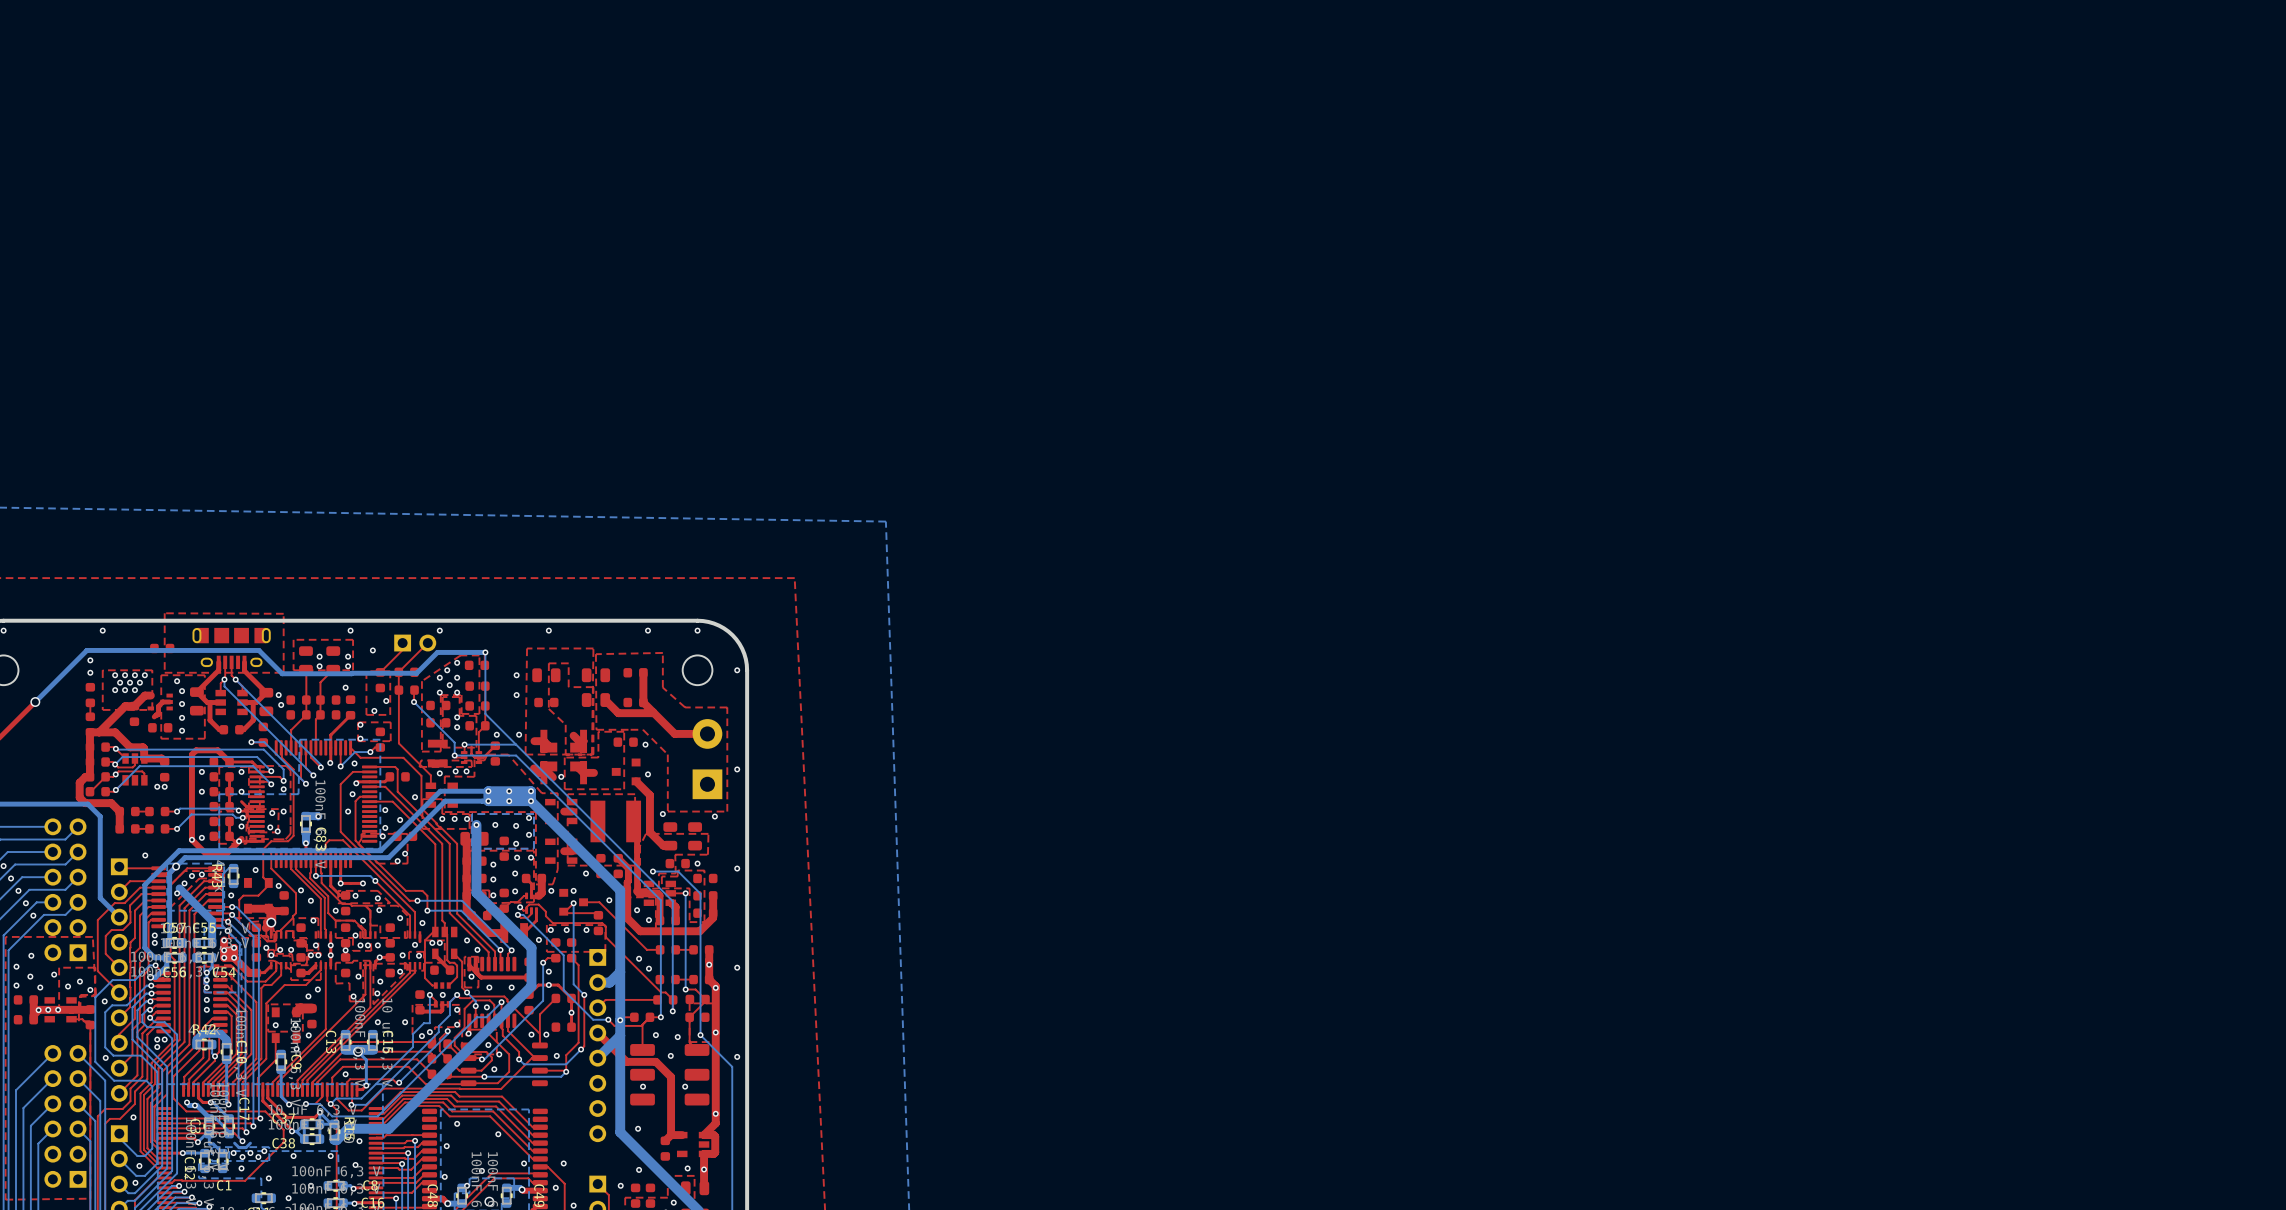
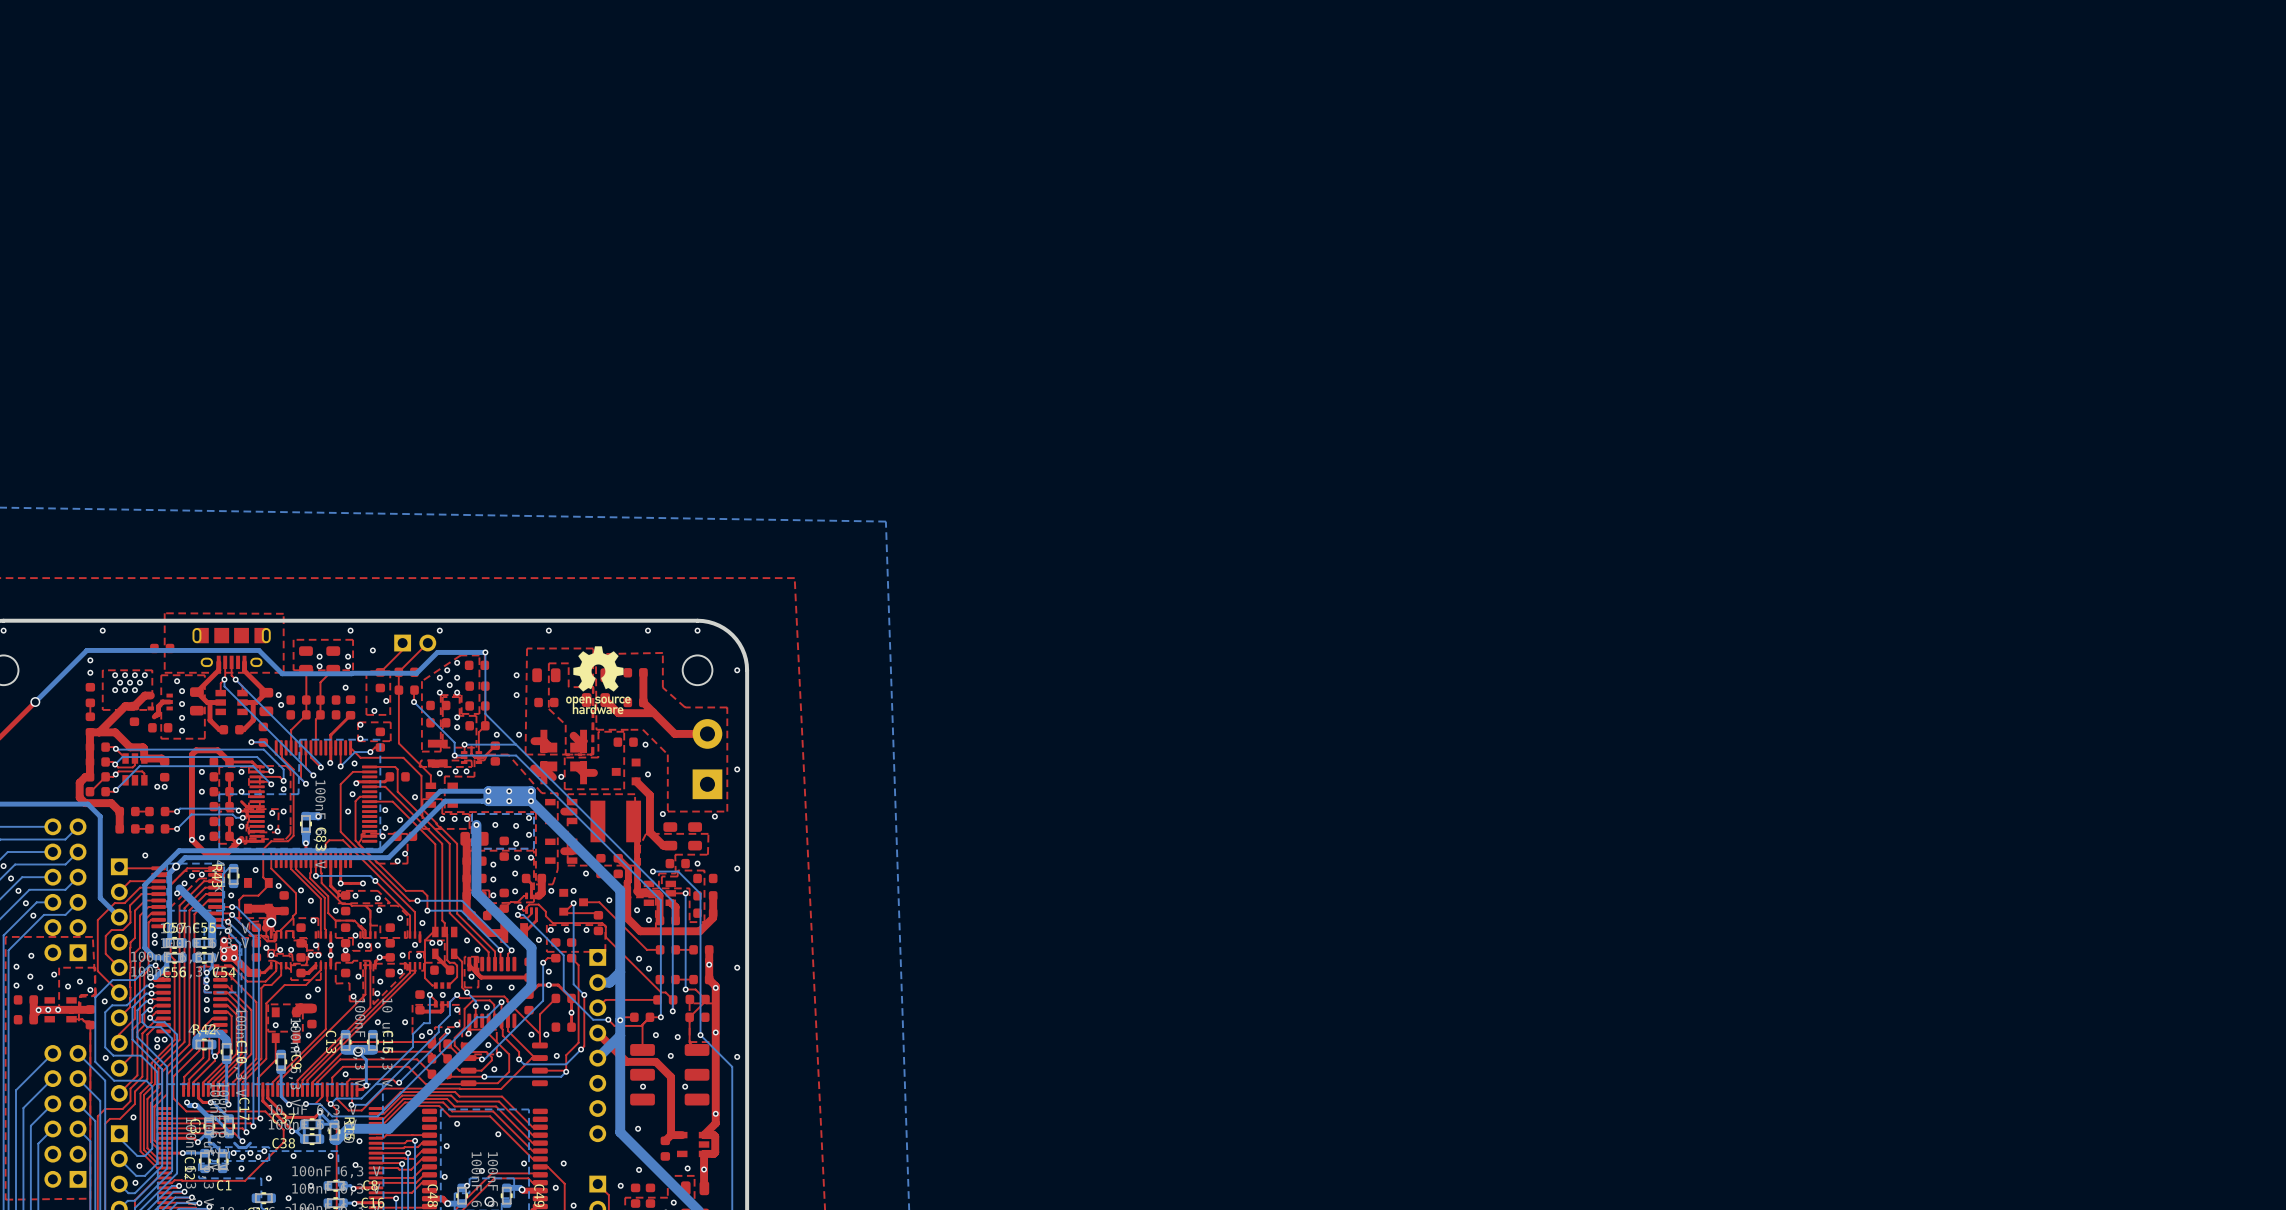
drawing: none -> [566, 646, 631, 715]

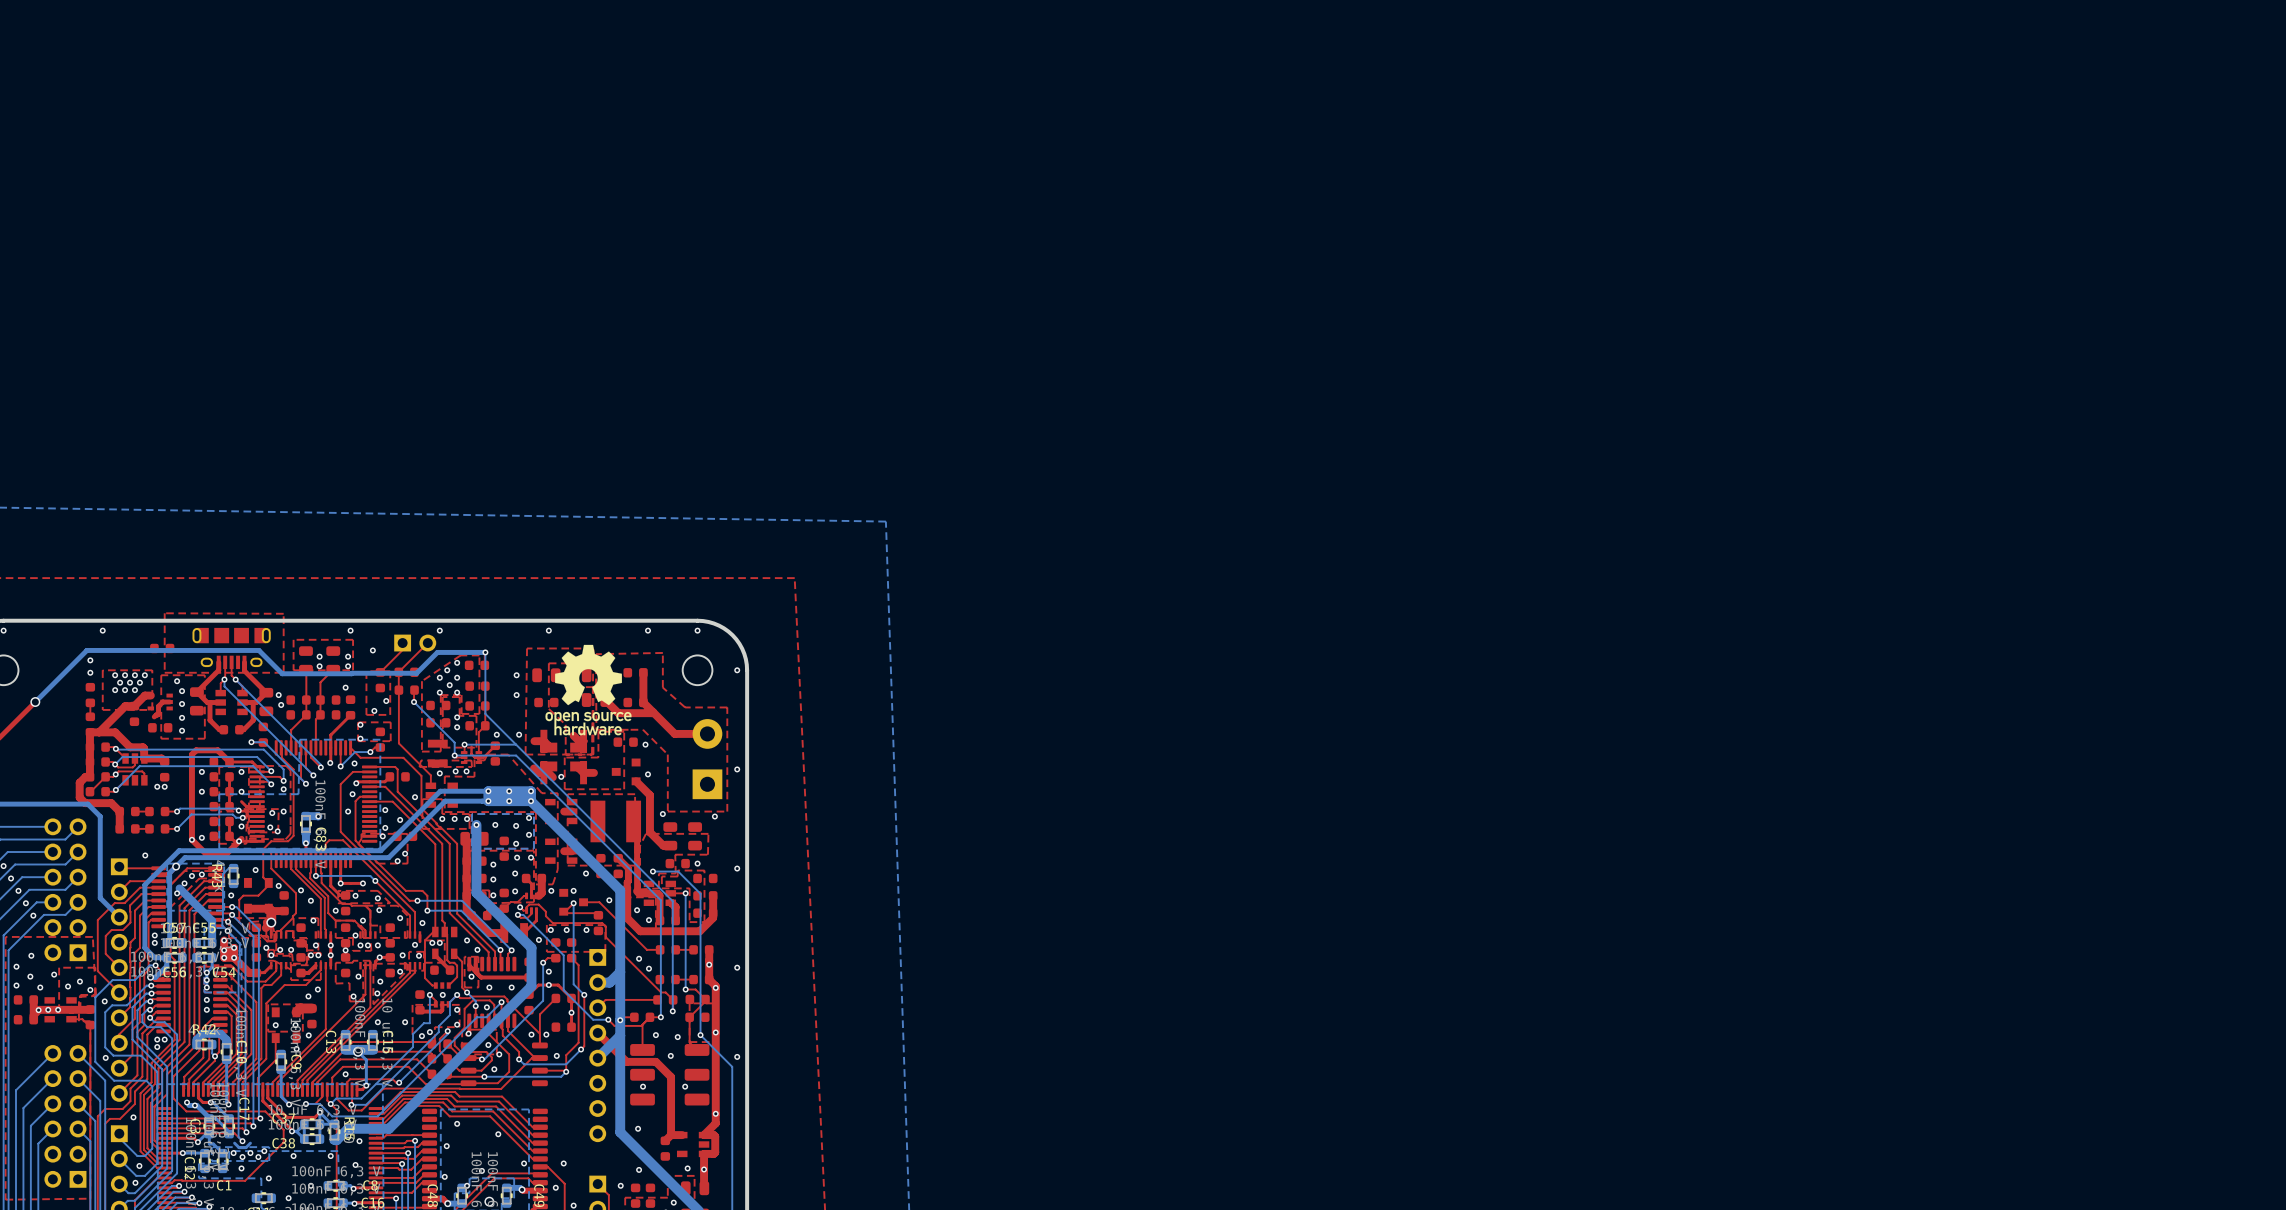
drawing: none -> [545, 644, 632, 736]
drawing: [566, 646, 631, 715] -> none

